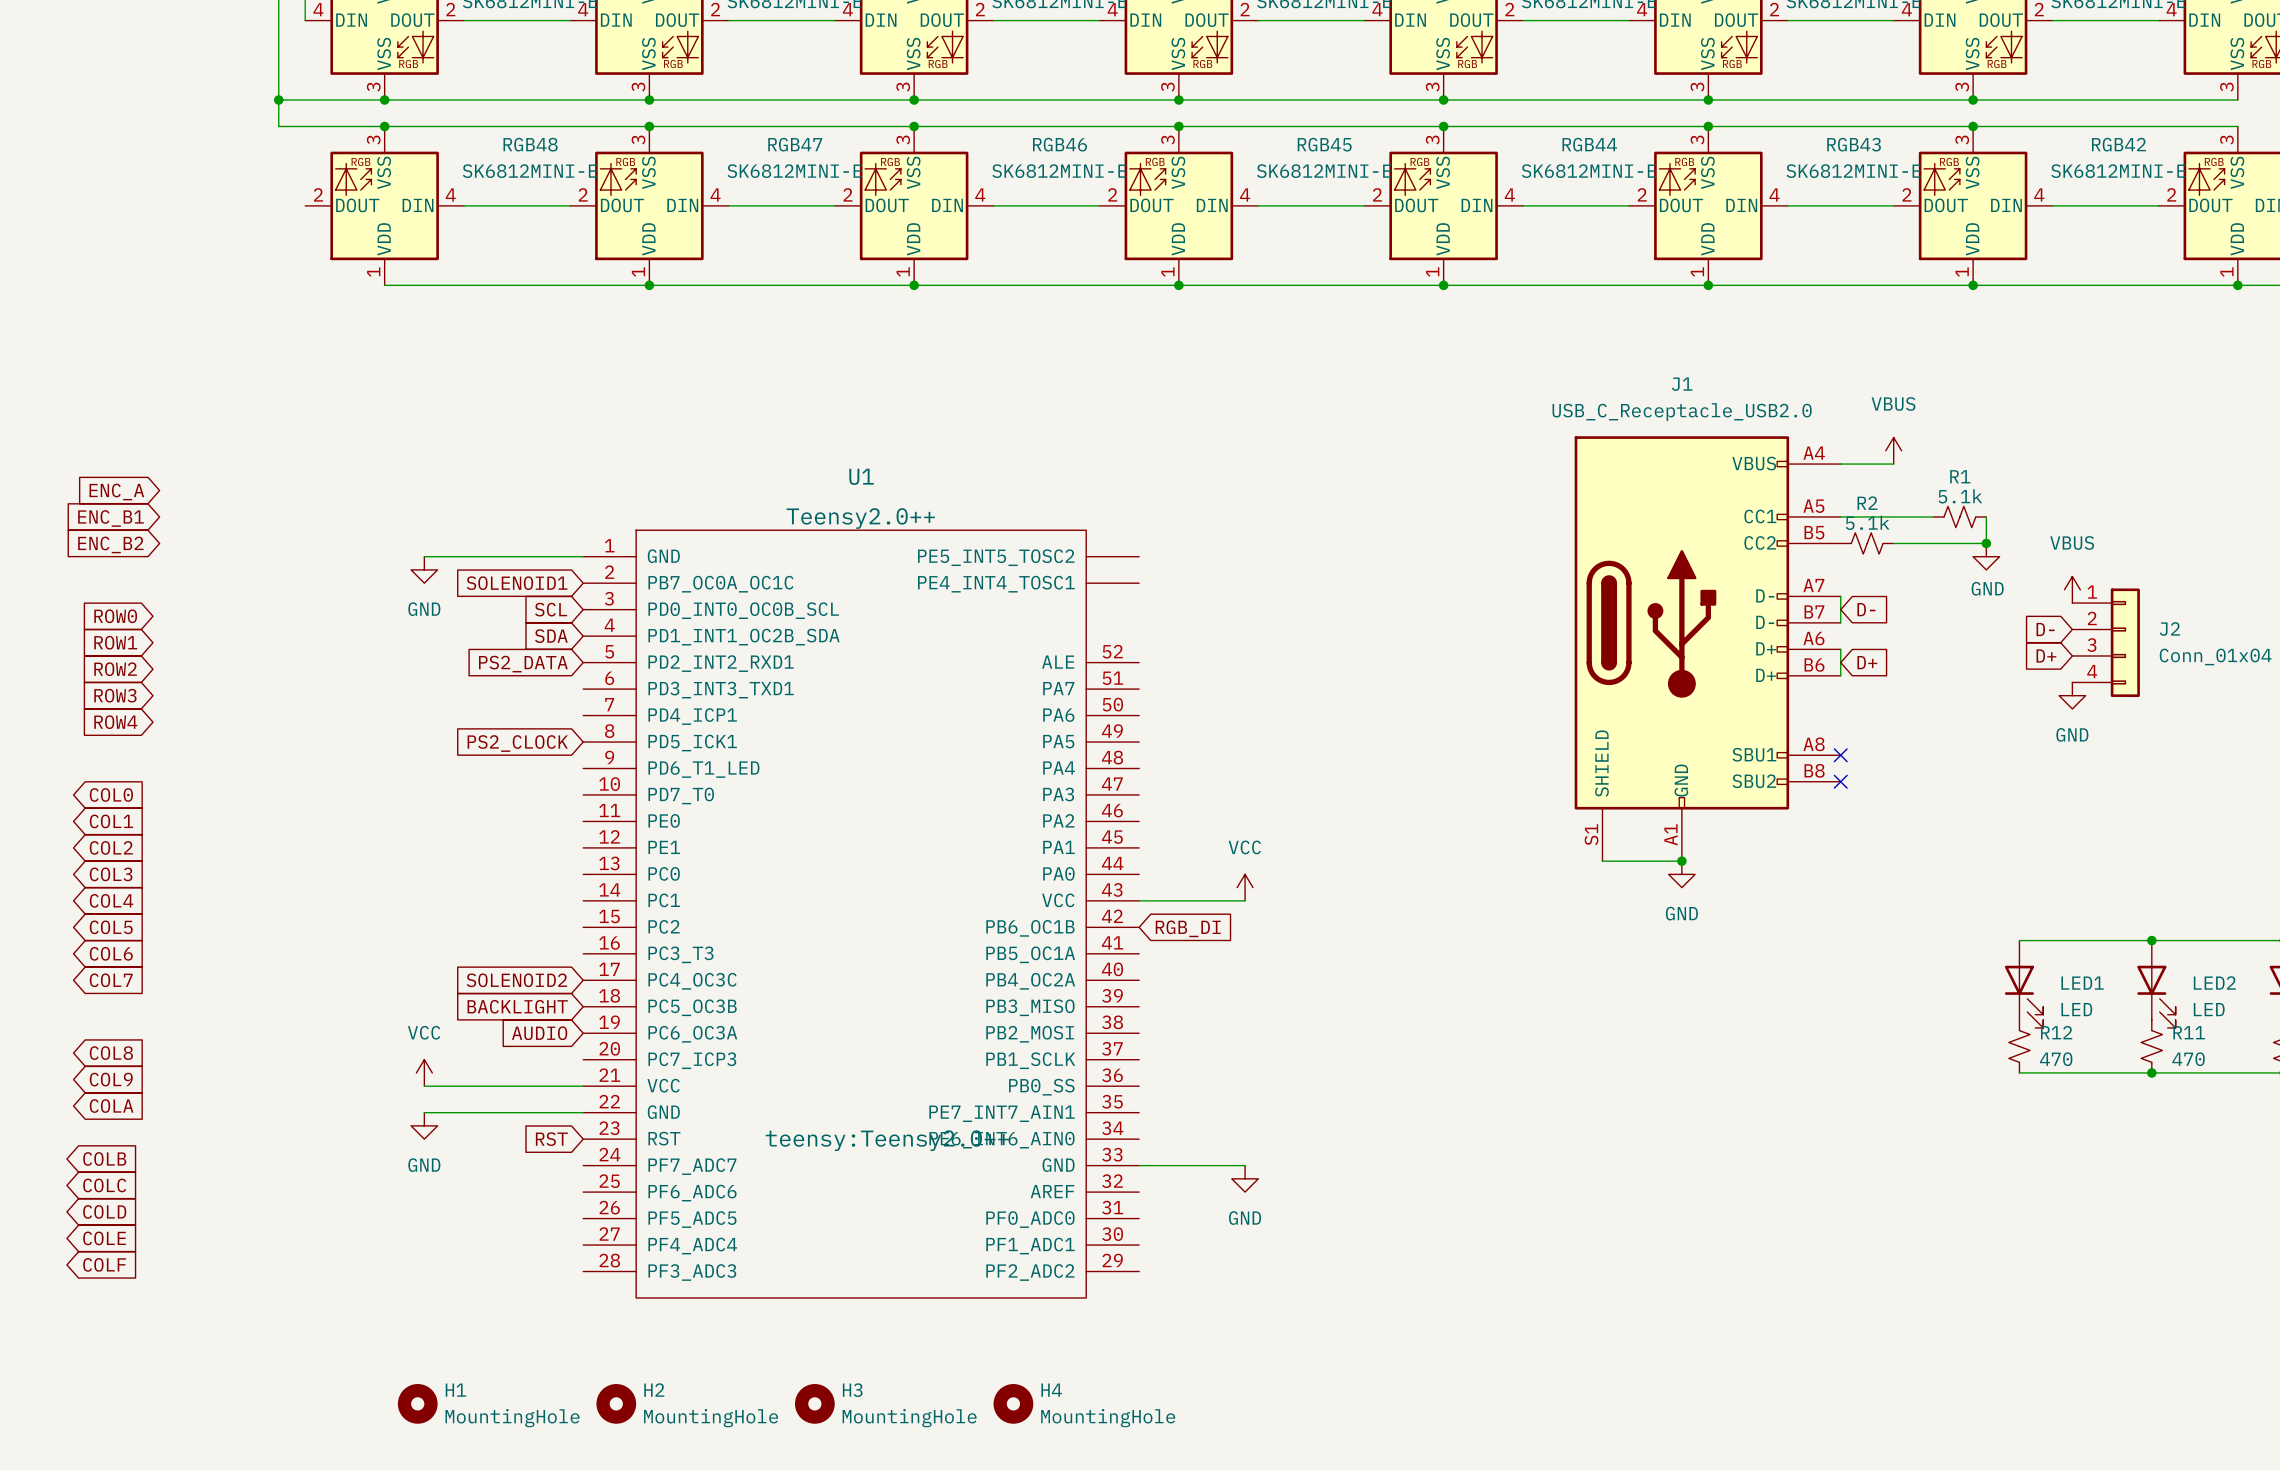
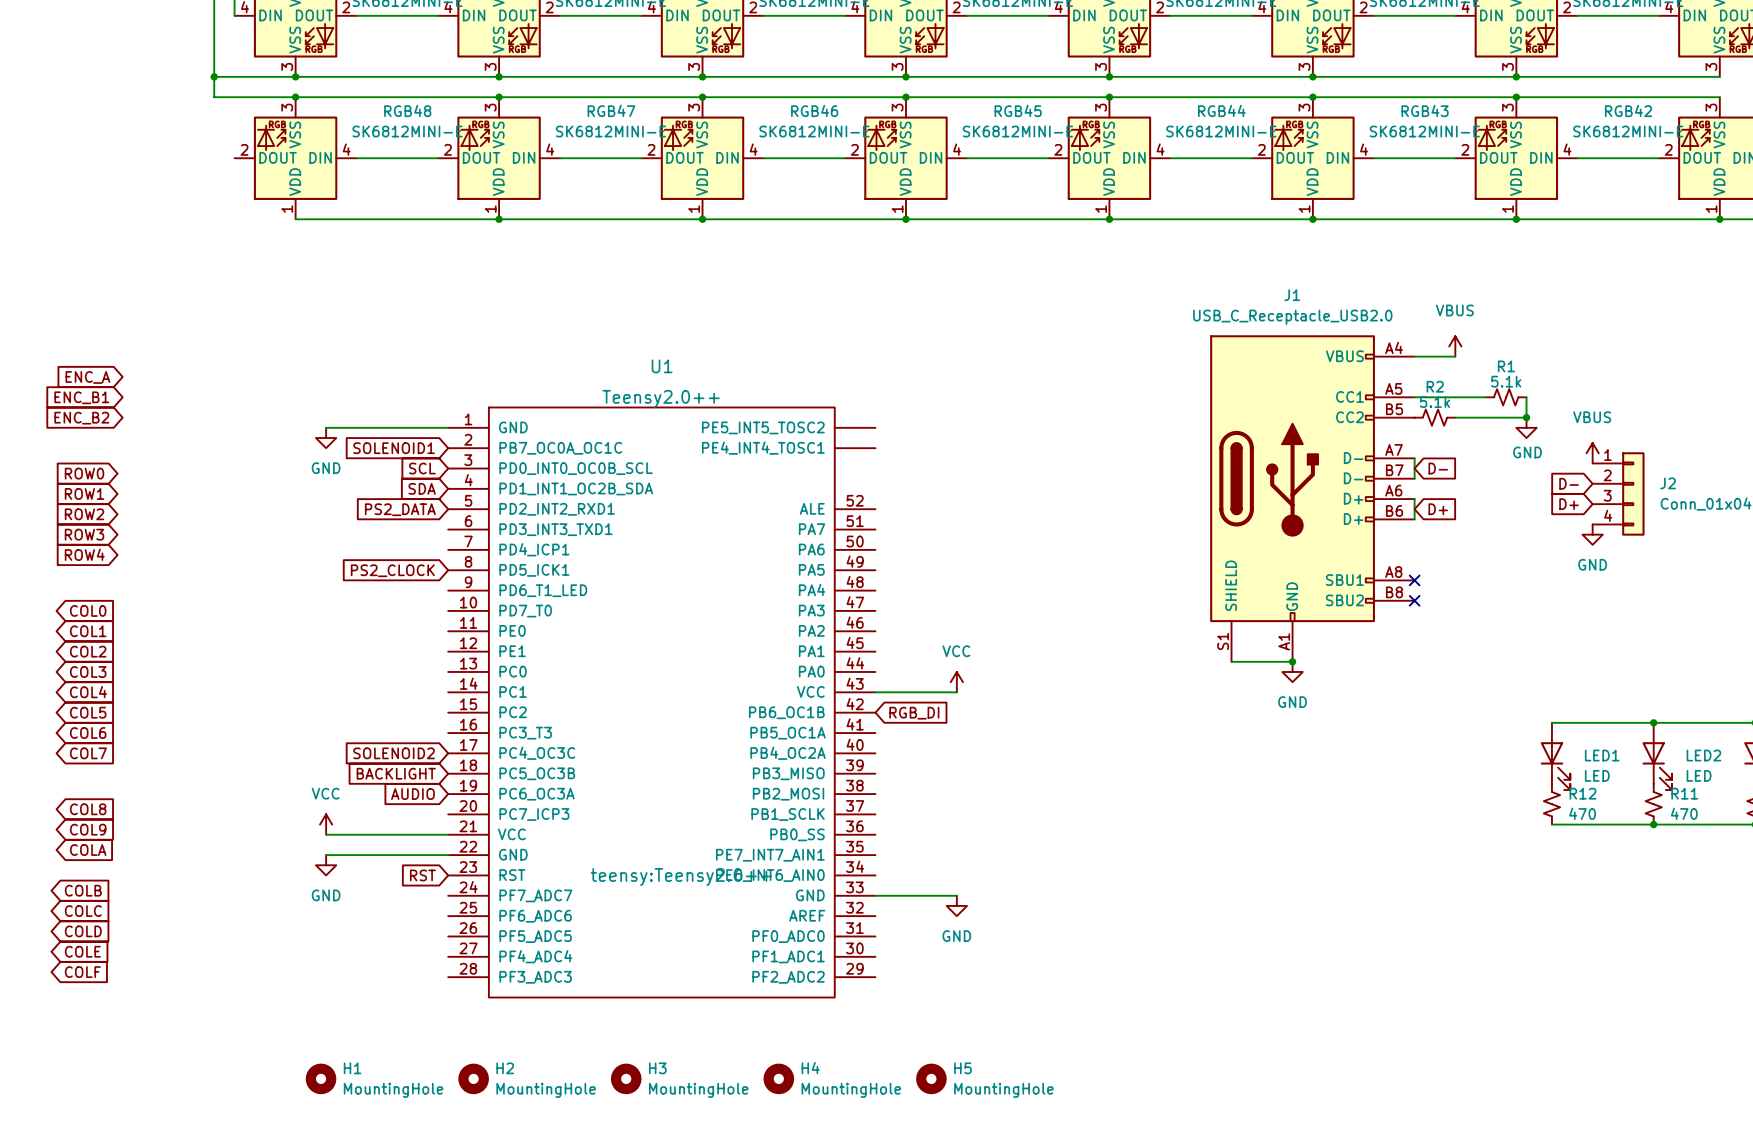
H5: none -> MountingHole (931, 1078)

